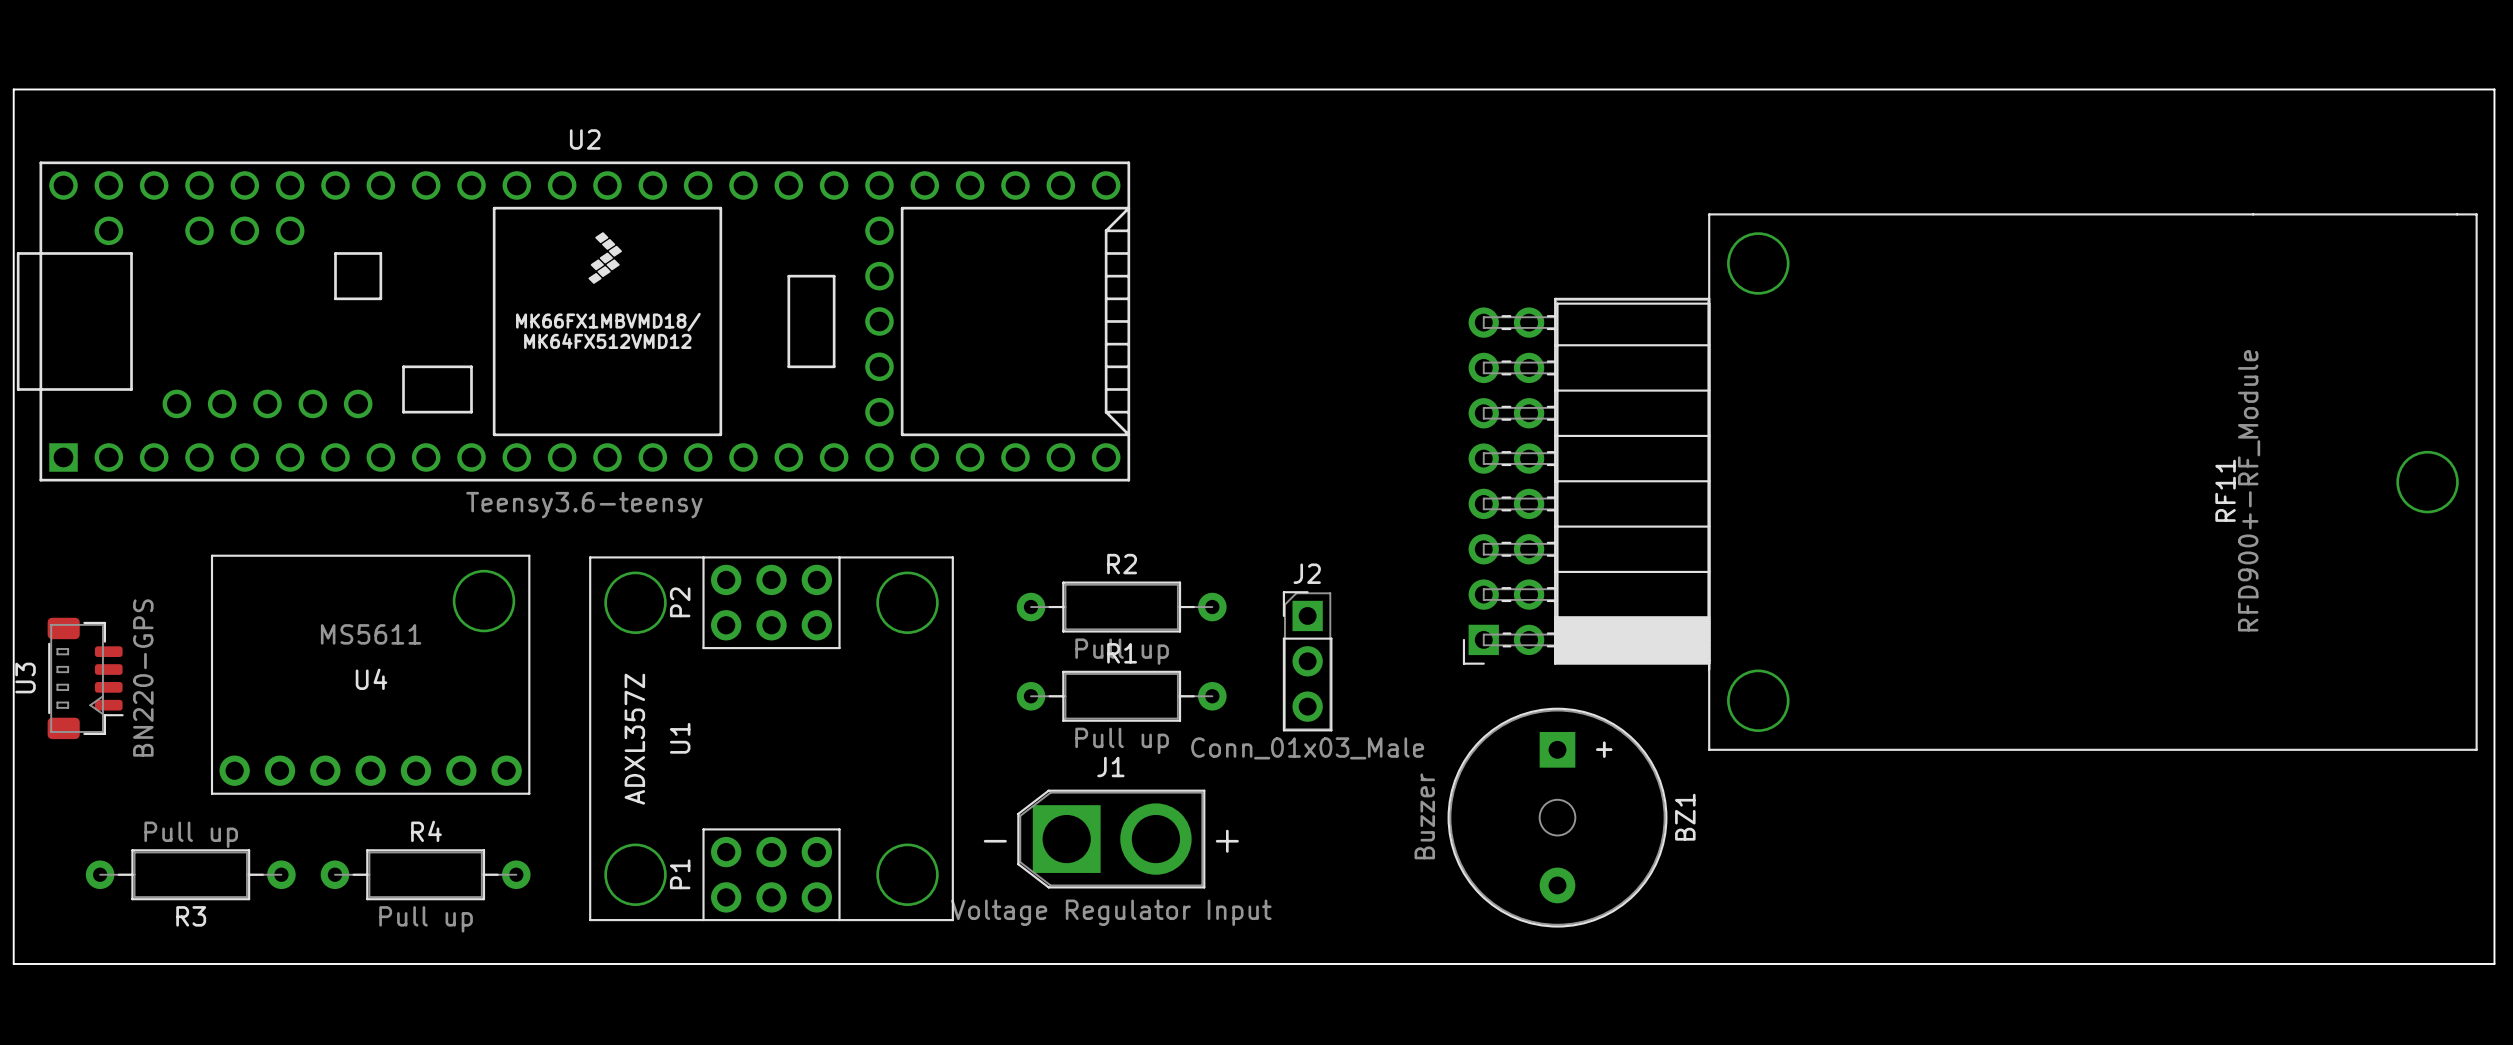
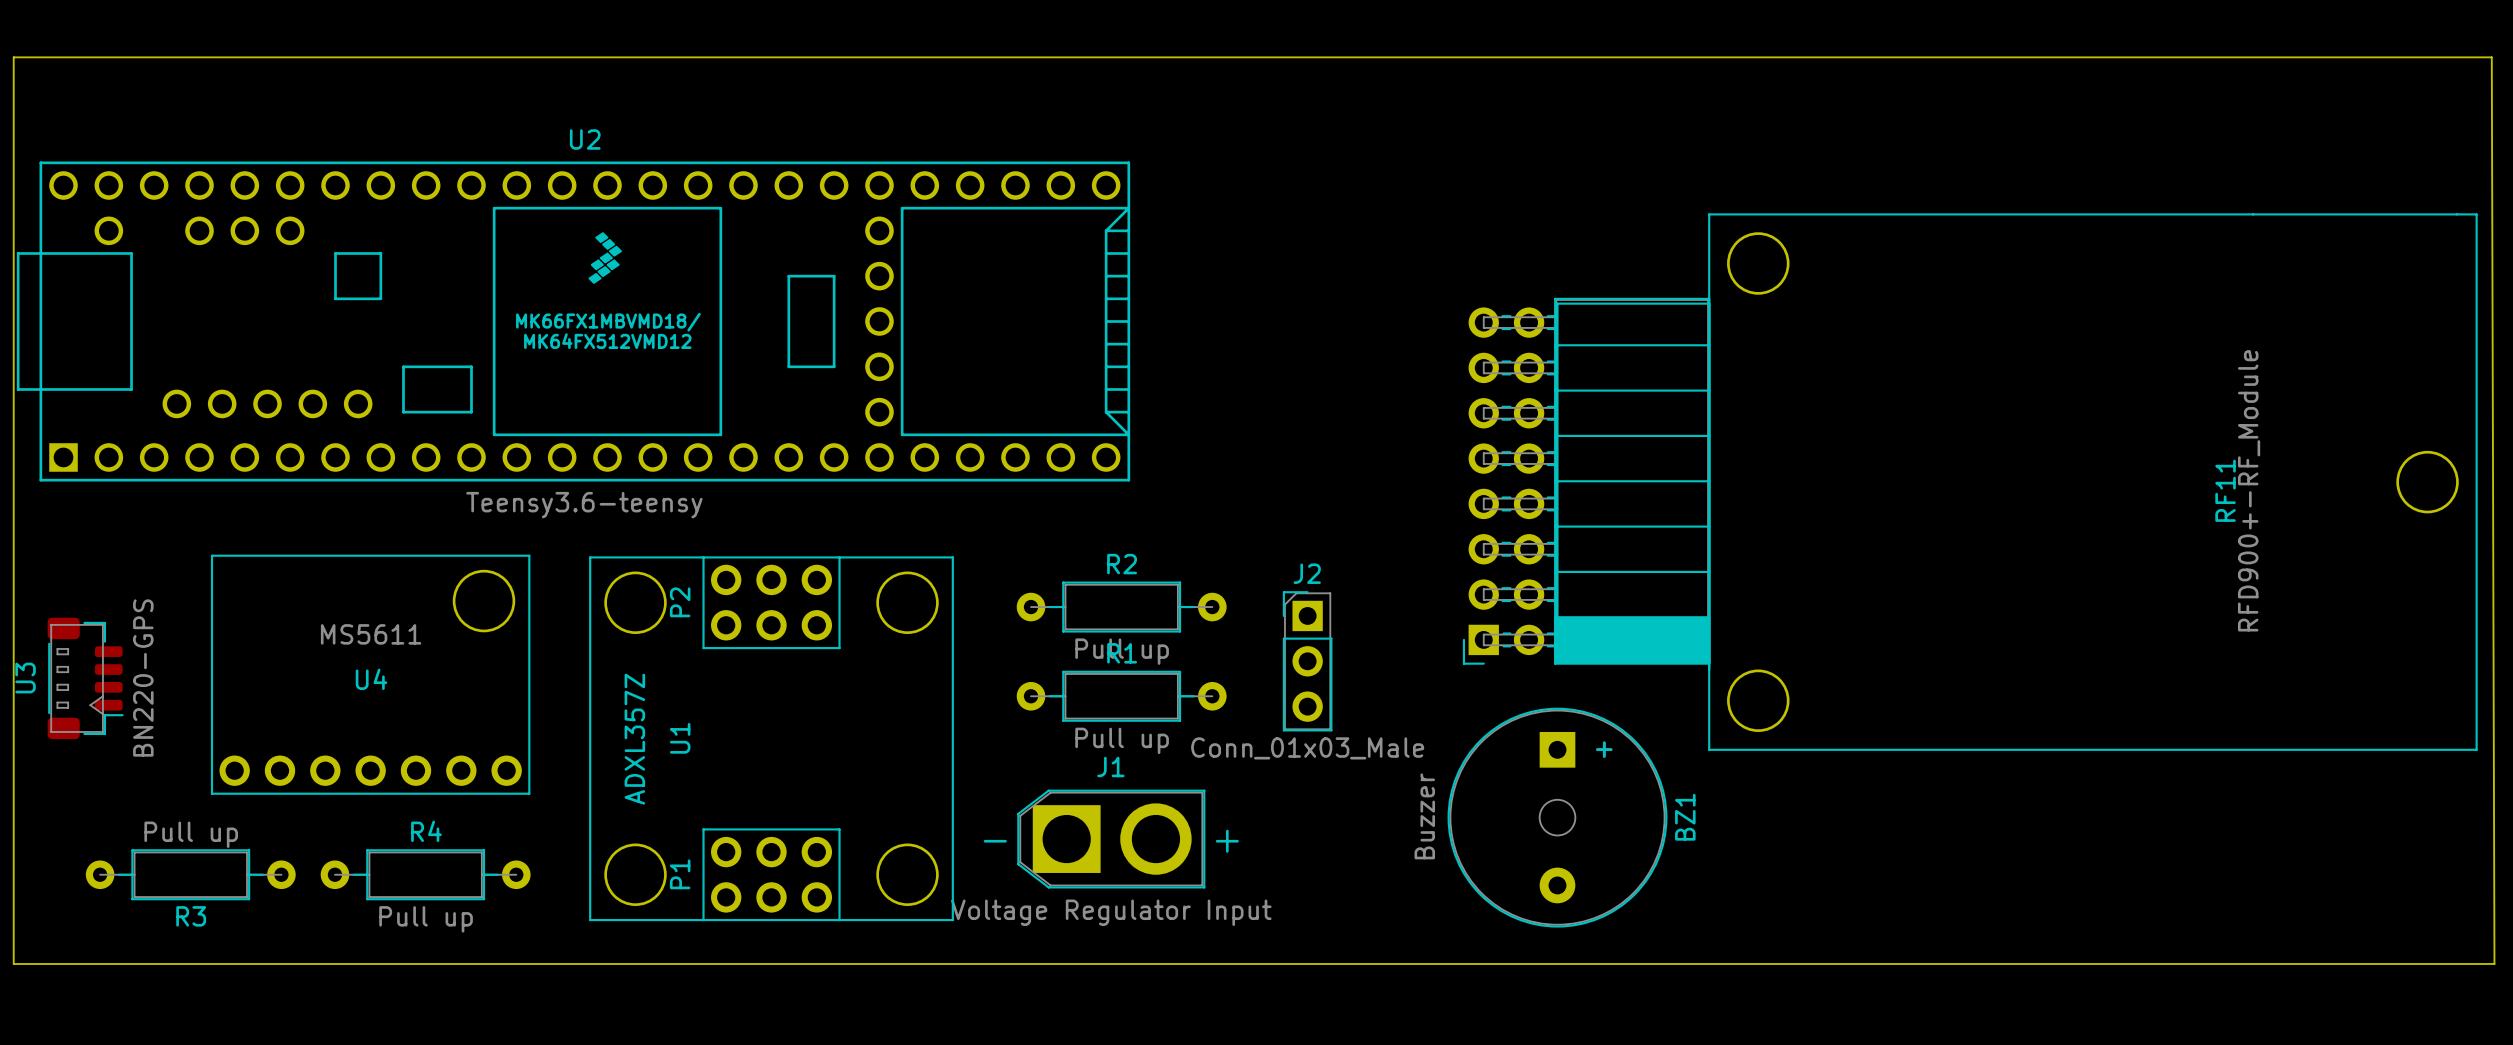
board edge: (13, 89) (2494, 89) (2494, 963) -> (13, 89) (13, 57) (2491, 57) (2494, 963)

